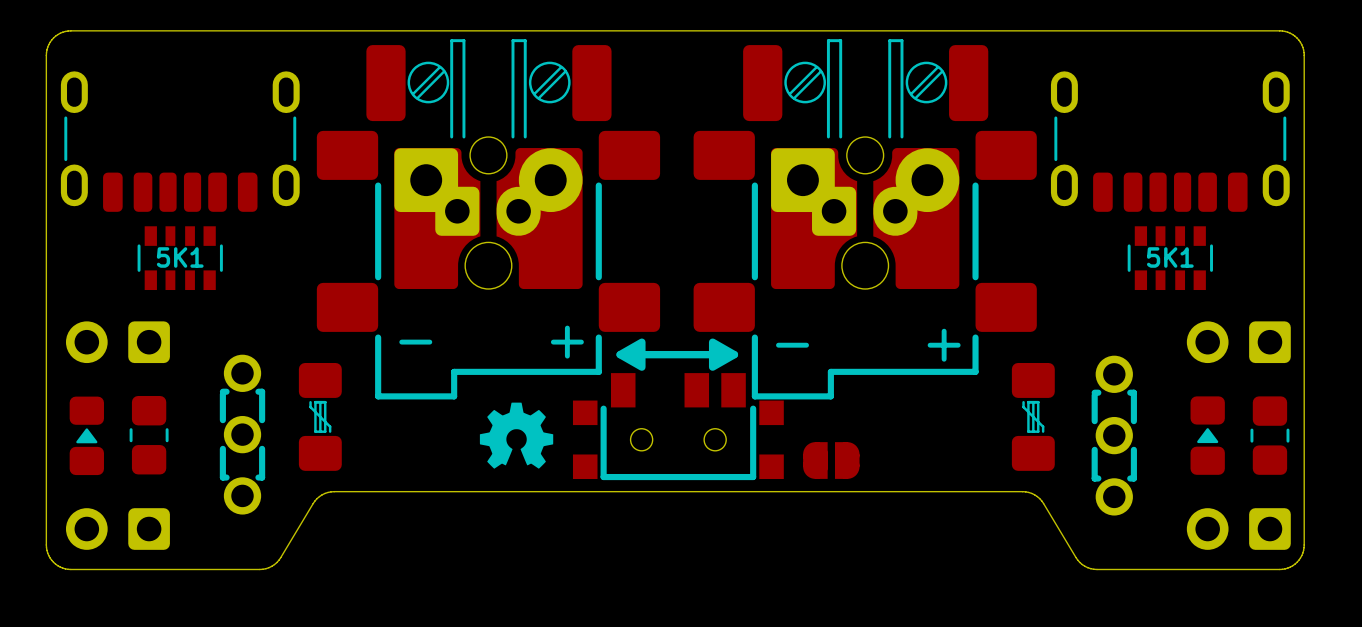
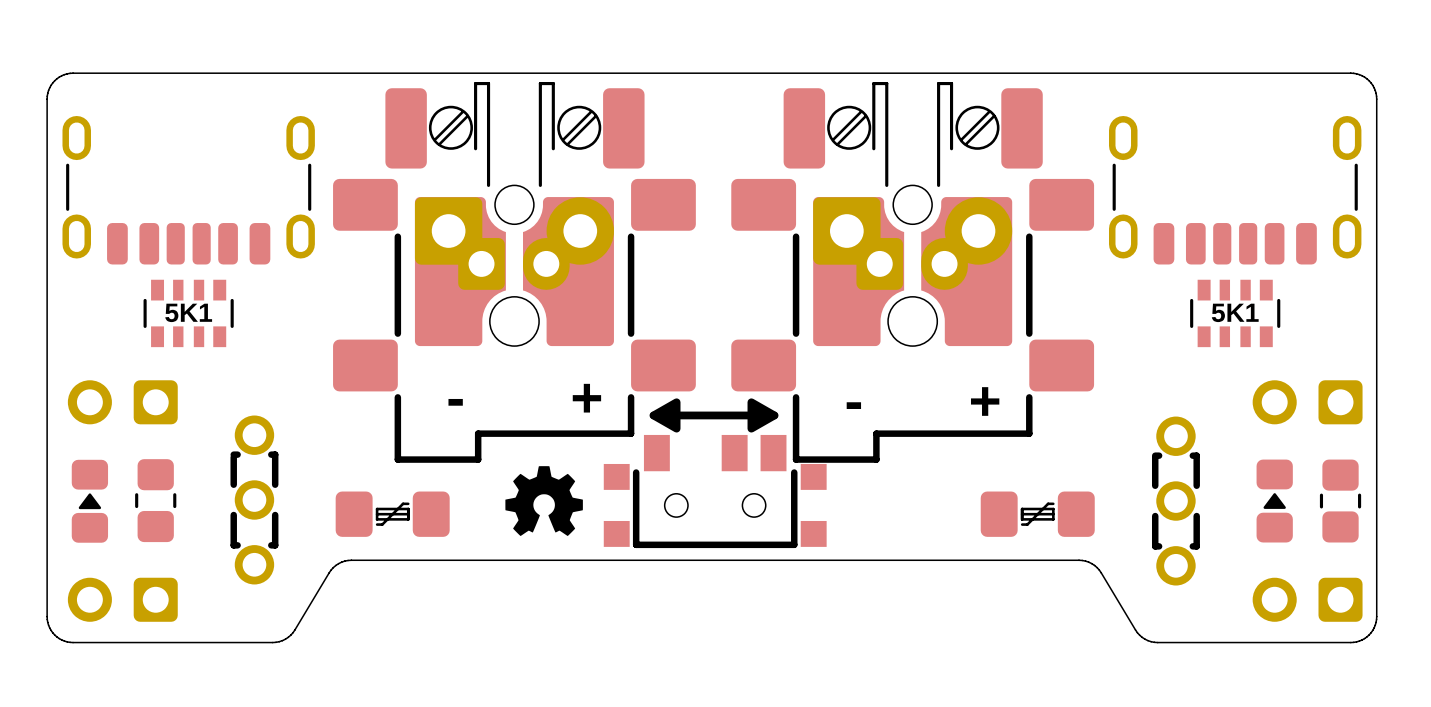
part footprint: [316, 39, 661, 400] -> [333, 82, 696, 463]
part footprint: [693, 39, 1037, 400] -> [731, 82, 1095, 463]
part rotation: 0° (320, 416) -> 90° clockwise (392, 514)
part rotation: 0° (1033, 416) -> 90° counterclockwise (1037, 514)
part: (831, 460) -> none

